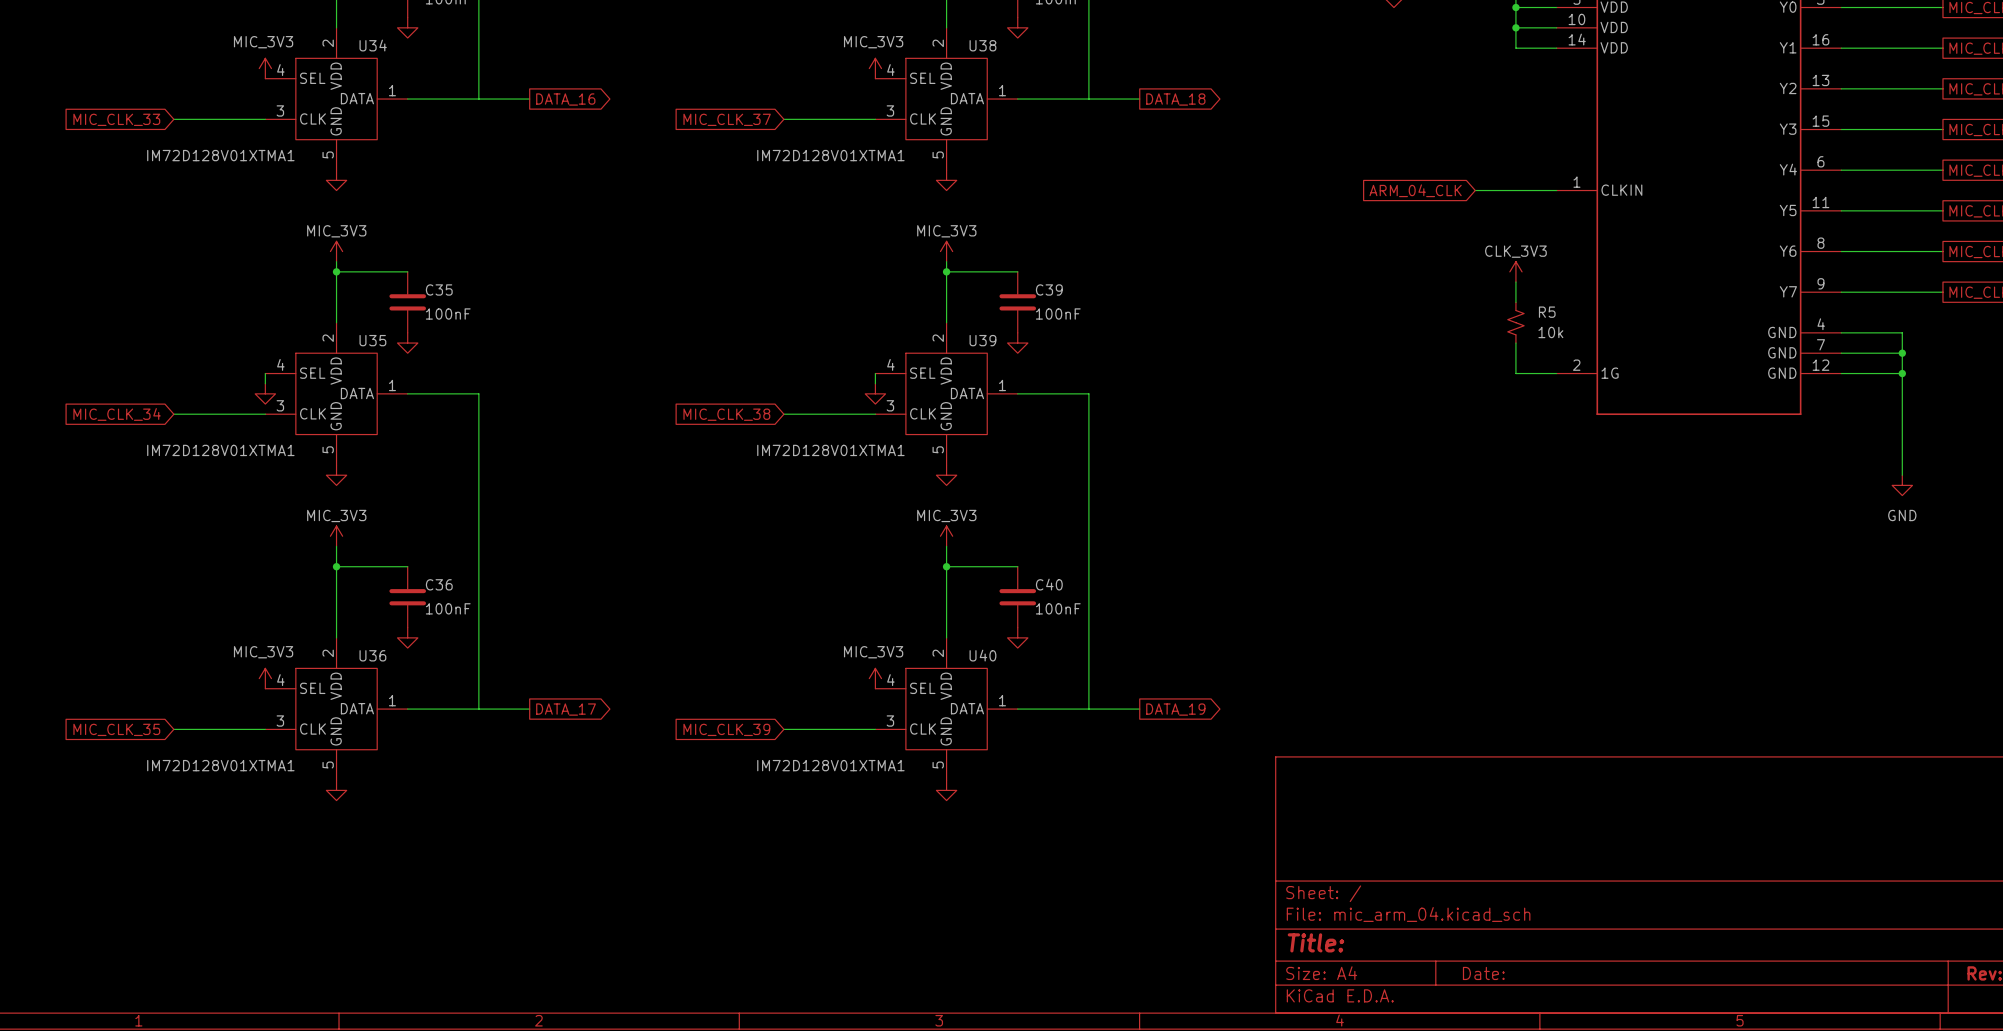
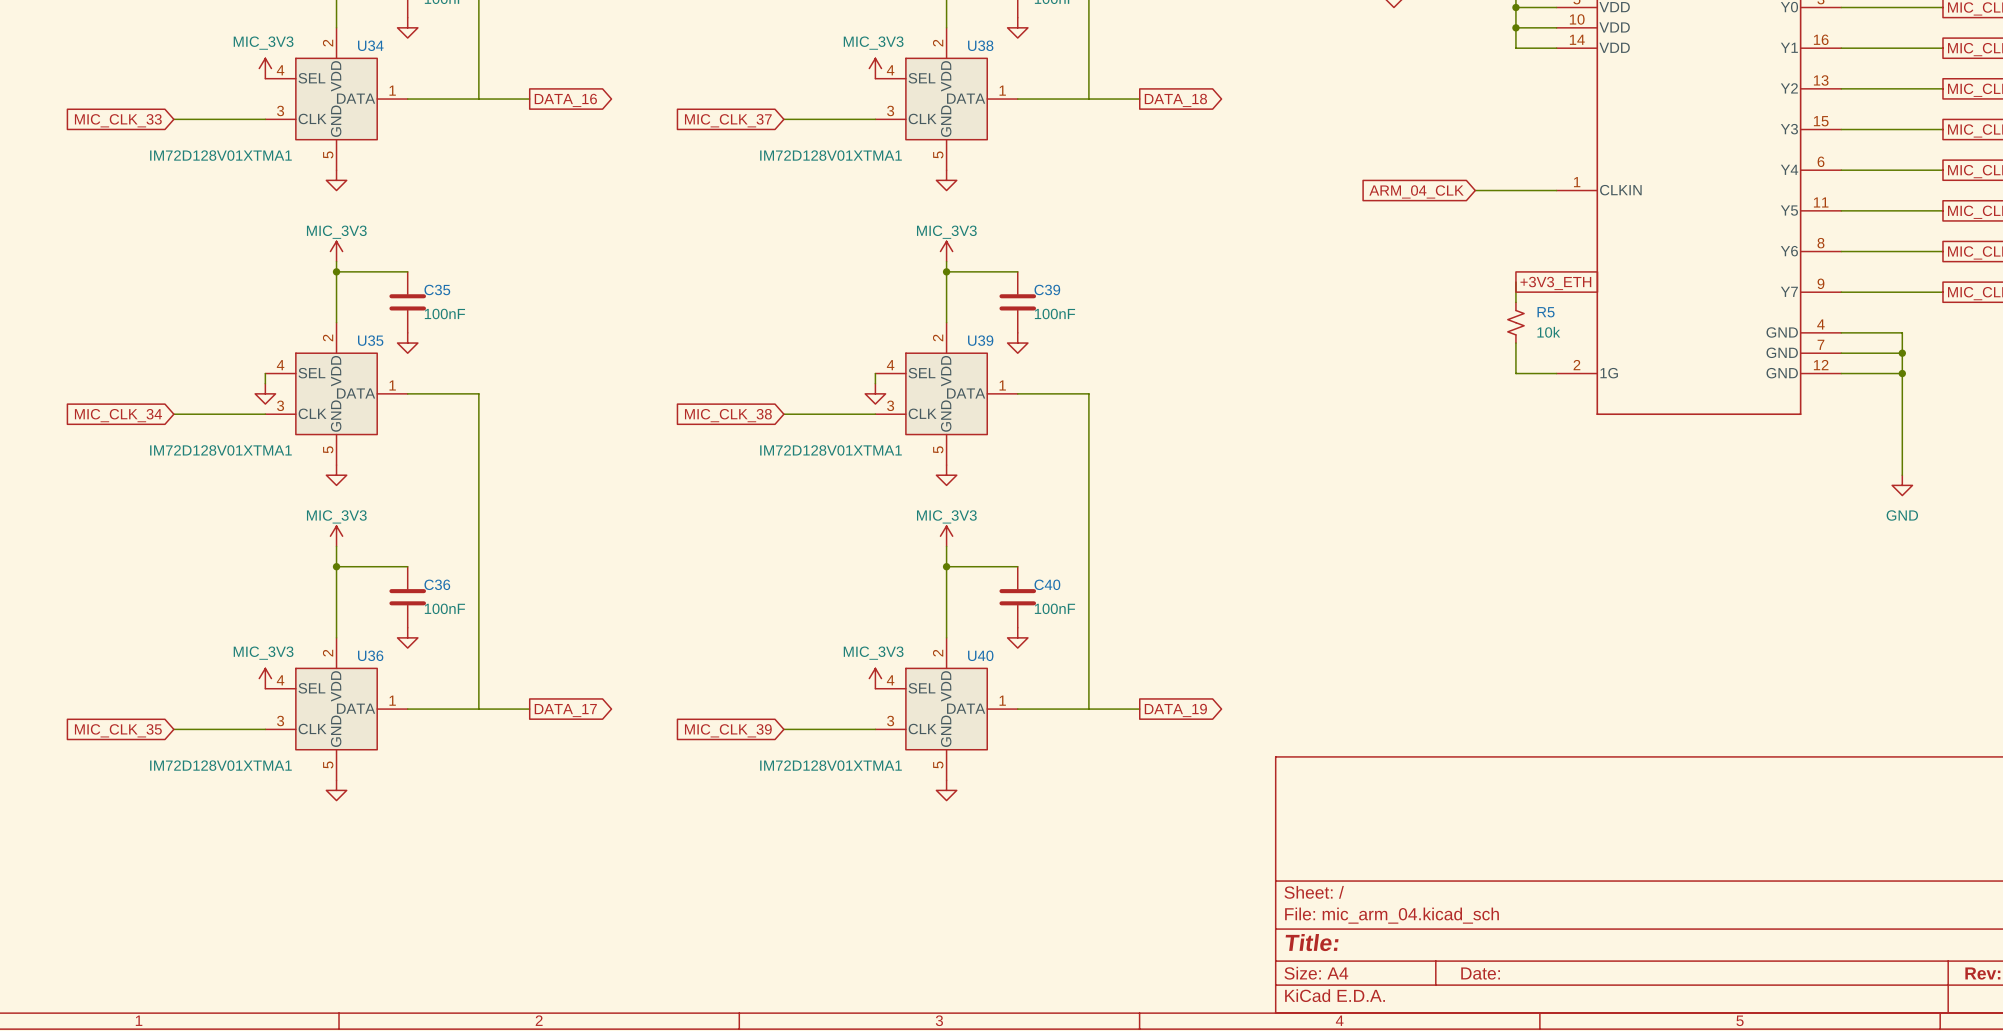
power symbol: CLK_3V3 (1515, 271) -> none
global label: none -> +3V3_ETH (1555, 283)

